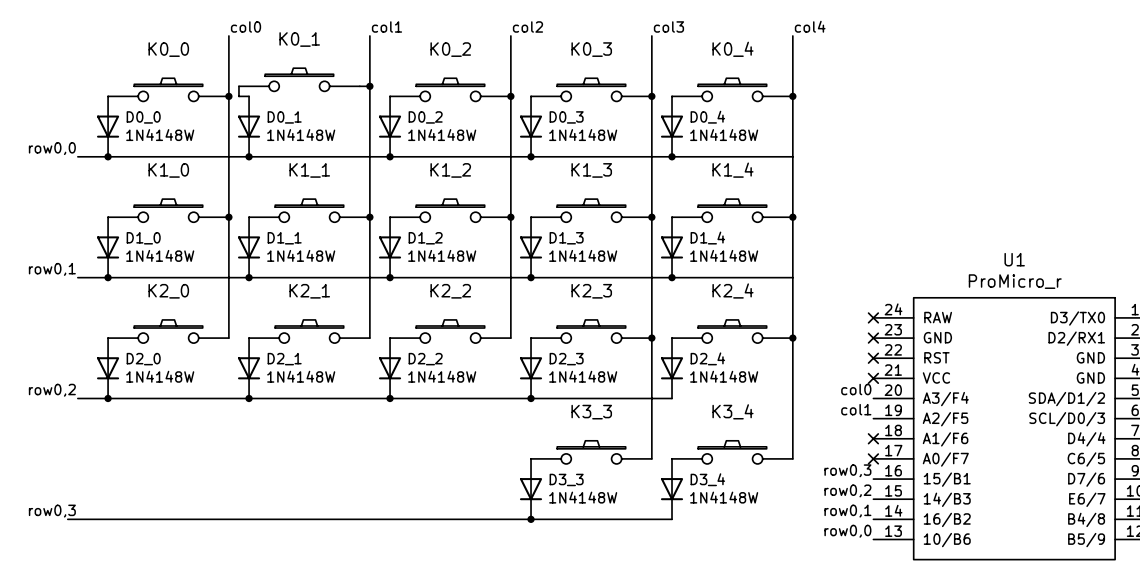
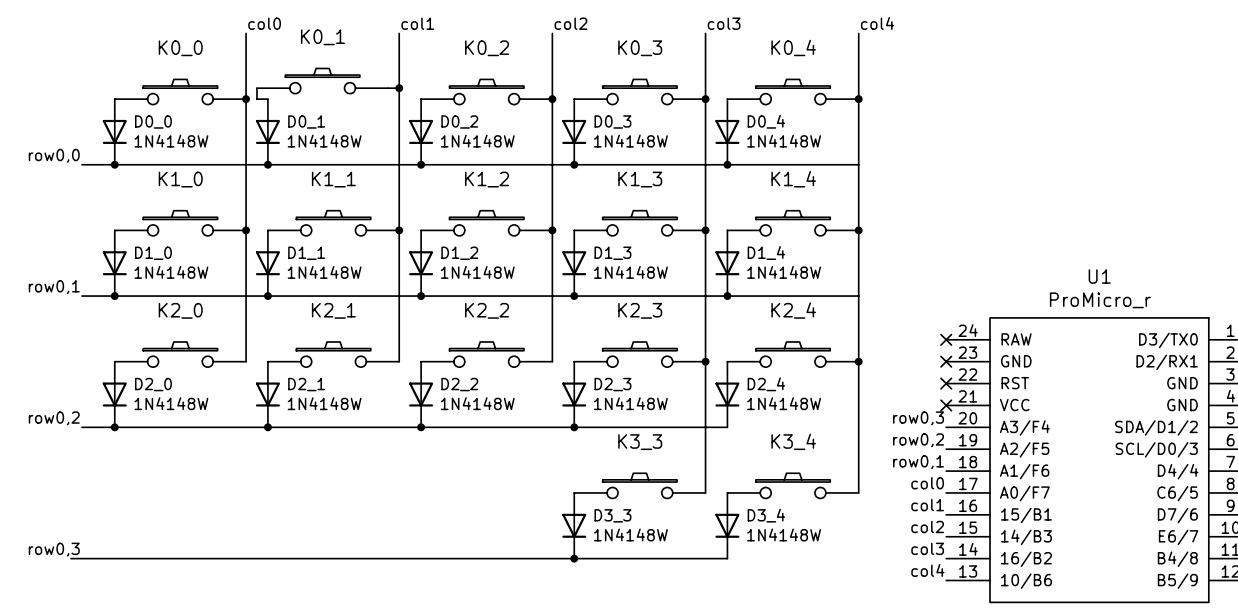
label: col0 (856, 389) -> row0,3 (918, 418)
label: col1 (856, 409) -> row0,2 (918, 440)
label: none -> row0,1 (918, 462)
no-connect mark: (873, 438) -> none
label: none -> col0 (927, 483)
no-connect mark: (873, 458) -> none
label: row0,3 (847, 470) -> col1 (927, 505)
label: row0,2 (847, 490) -> col2 (927, 526)
label: row0,1 (847, 511) -> col3 (927, 548)
label: row0,0 (847, 531) -> col4 (927, 570)

